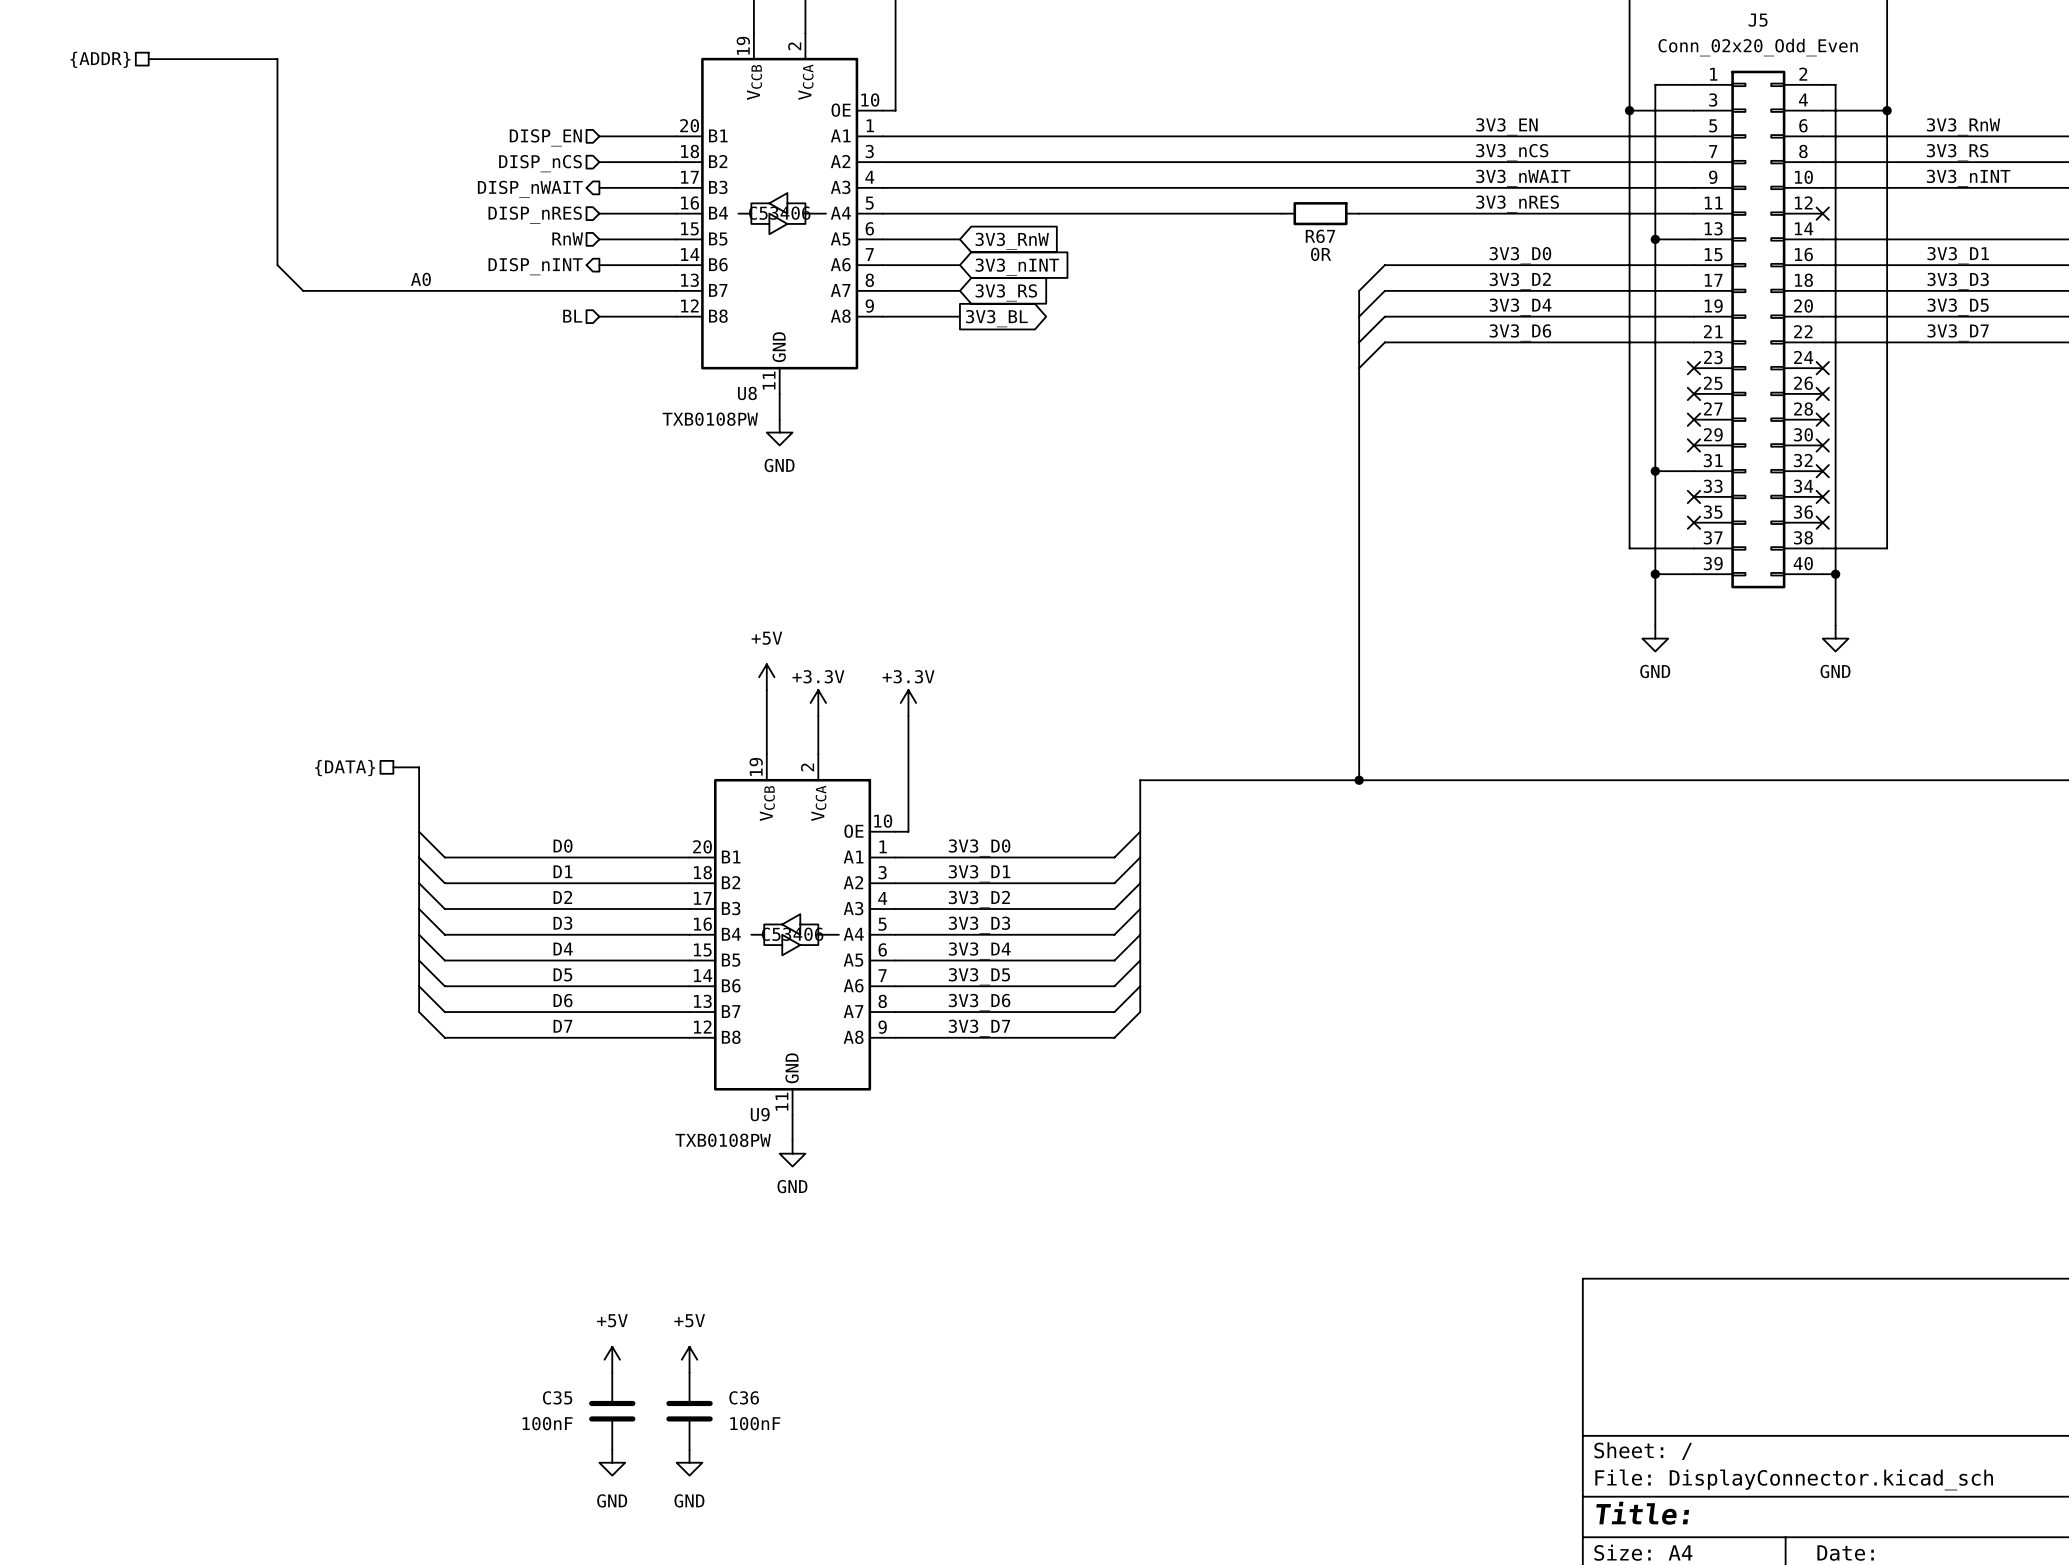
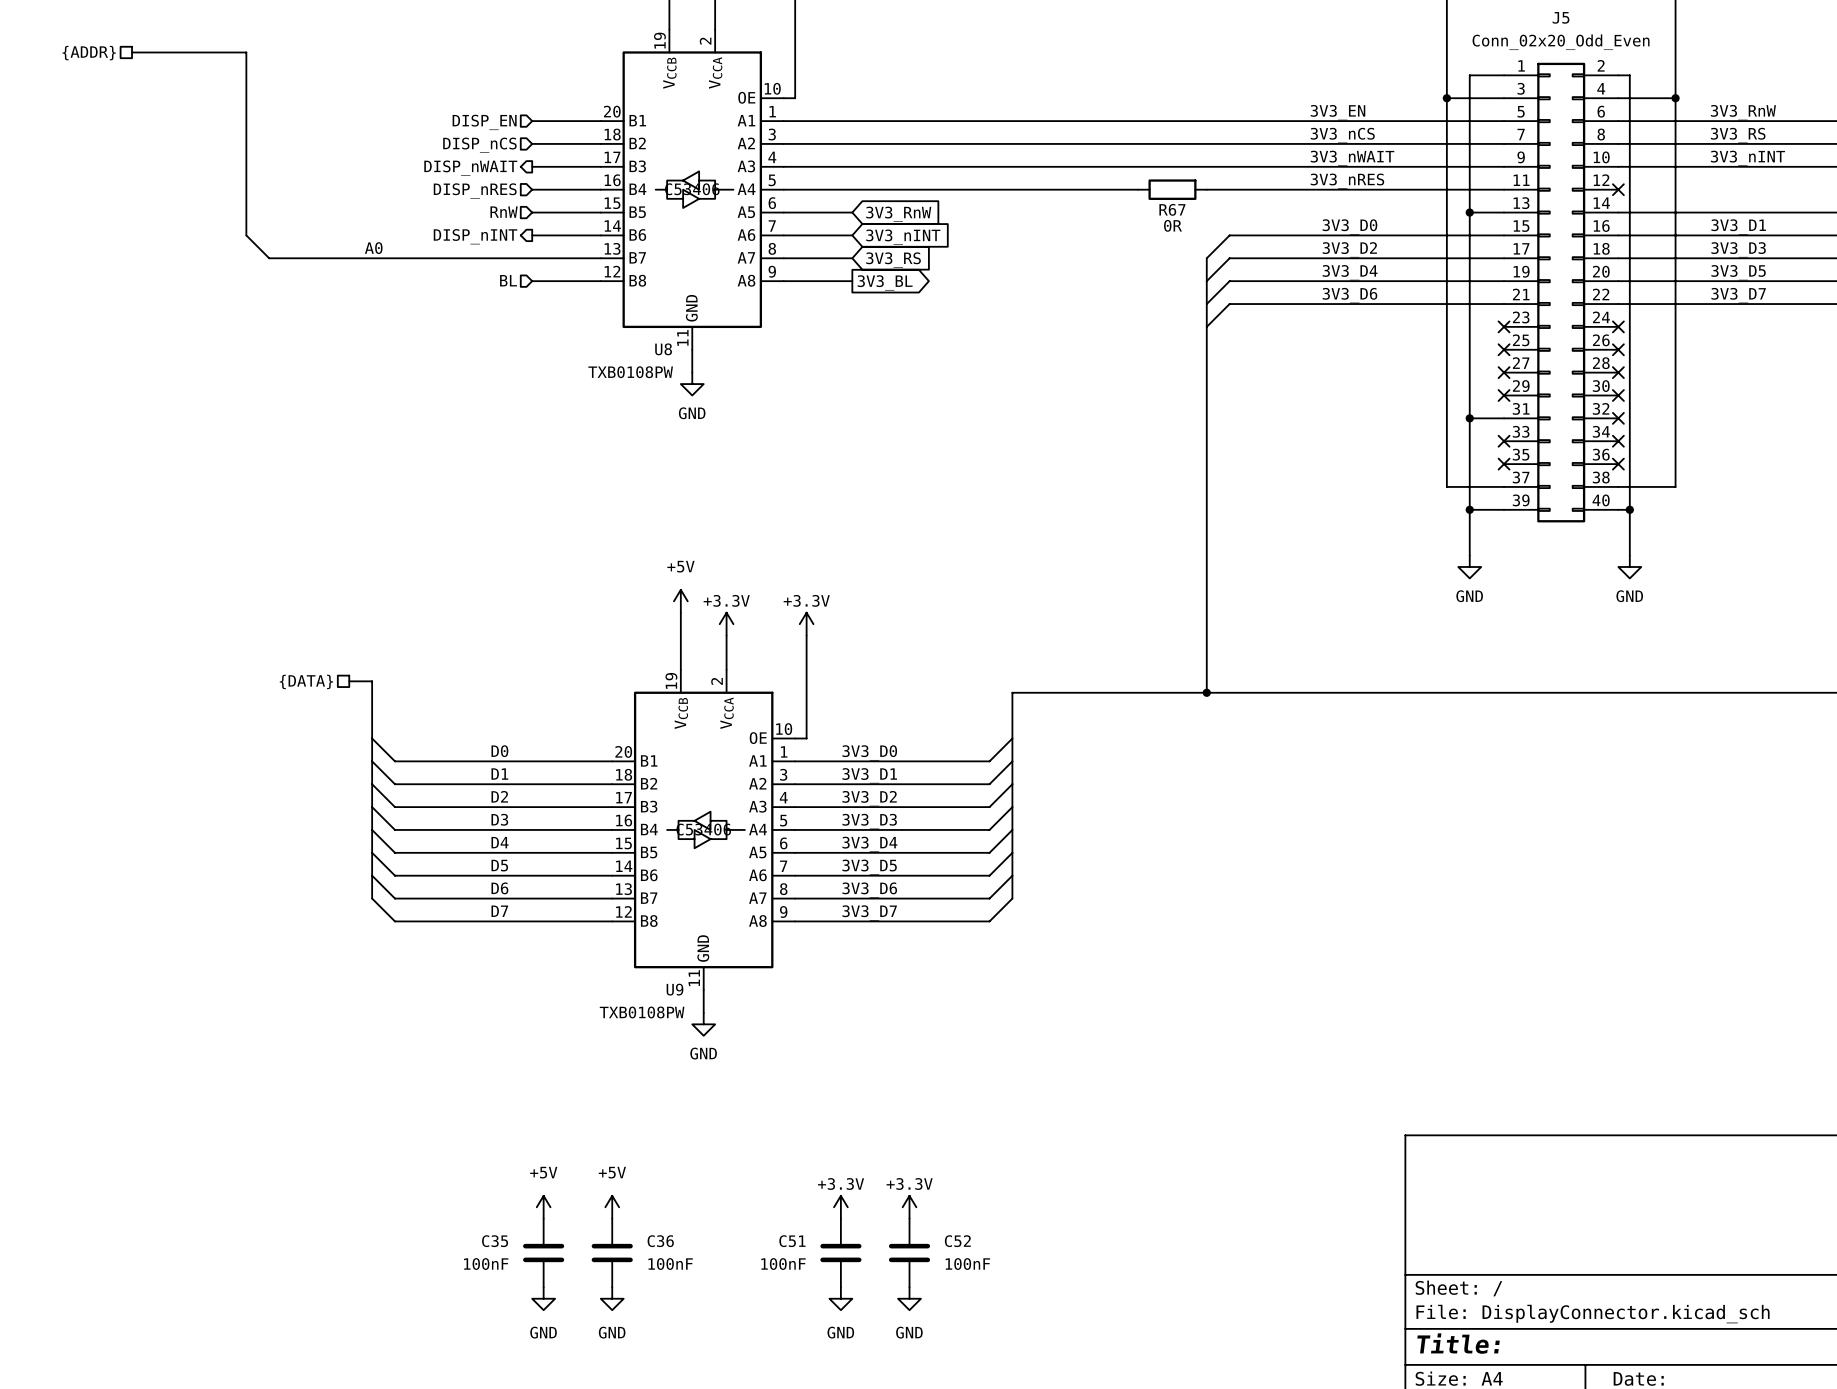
power symbol: none -> +3.3V (840, 1207)
power symbol: none -> +3.3V (909, 1207)
C51: none -> 100nF (840, 1253)
C52: none -> 100nF (909, 1253)
power symbol: none -> GND (840, 1298)
power symbol: none -> GND (909, 1298)

